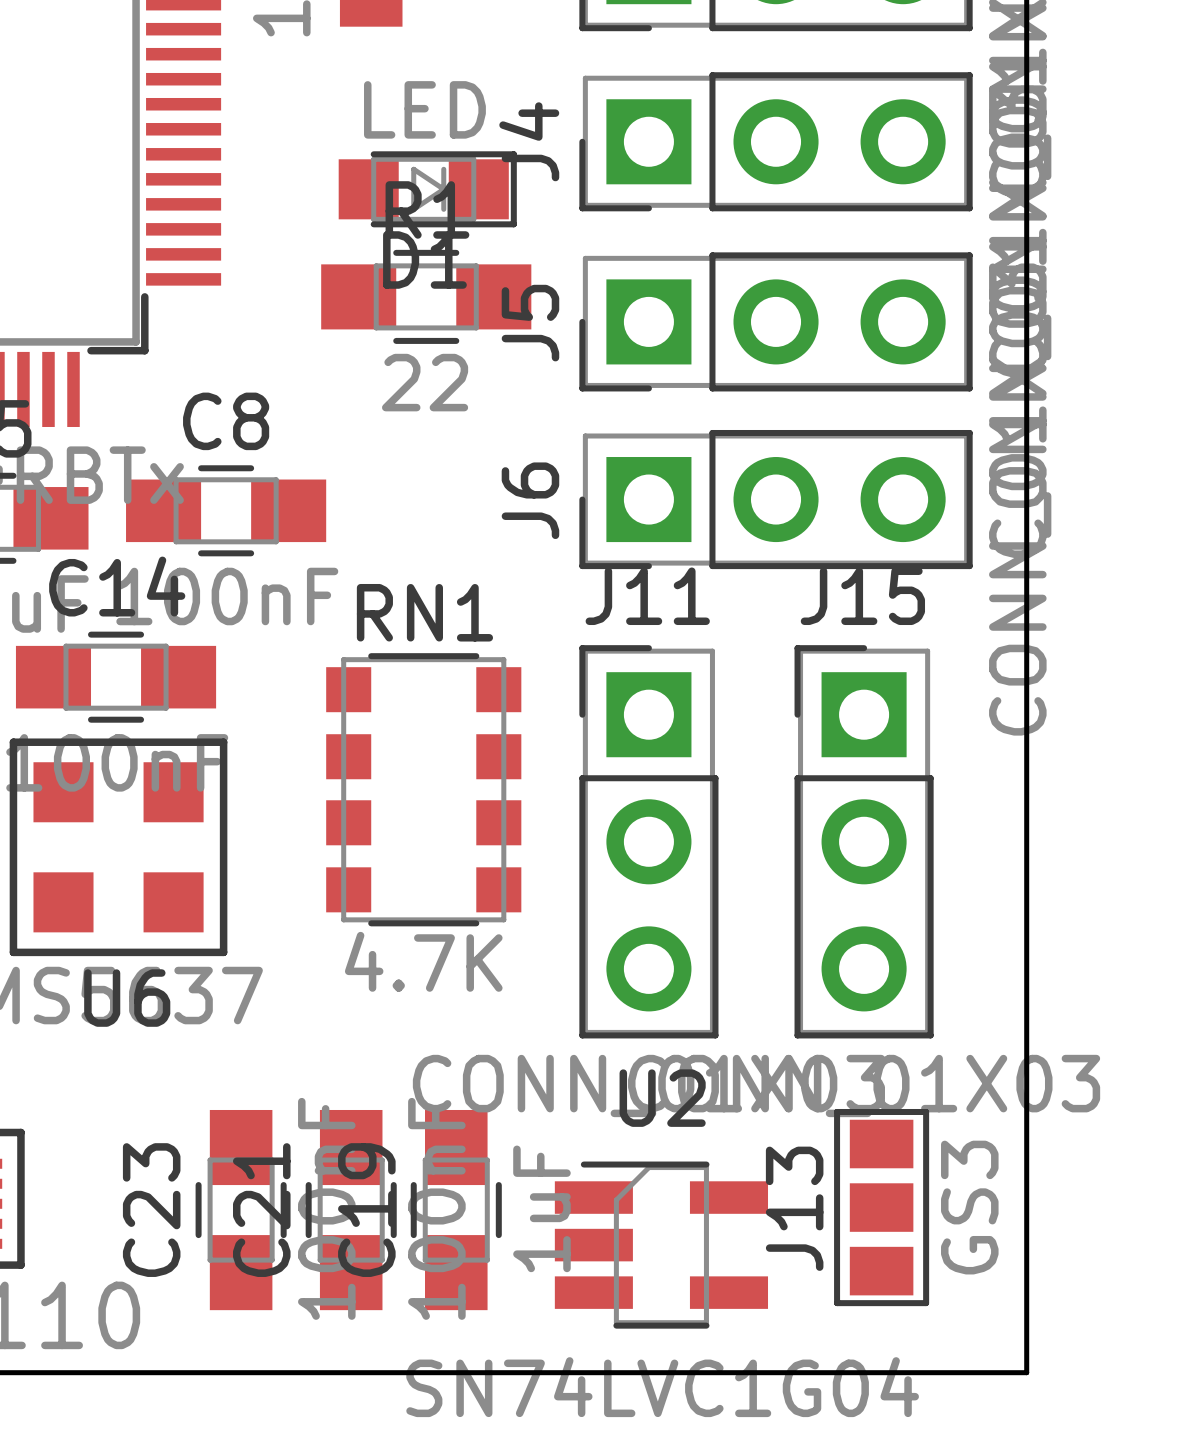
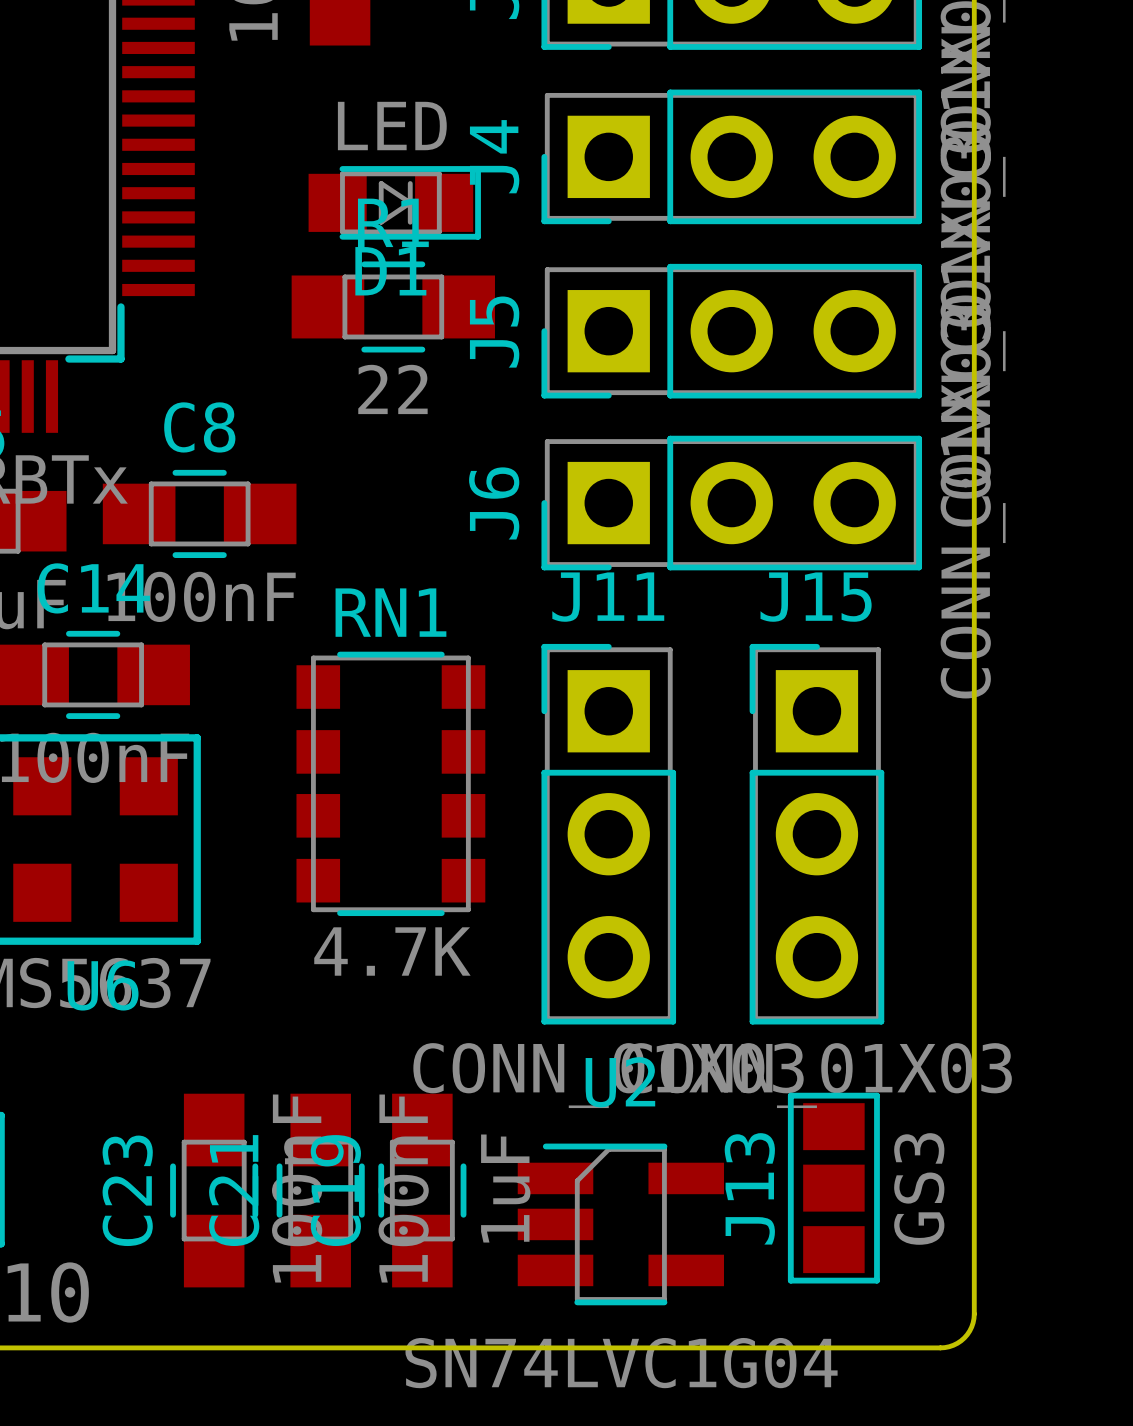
board edge: (1026, 1337) (1026, 1372) (991, 1372) -> (974, 1314) (971, 1326) (964, 1337) (953, 1345) (940, 1347)

